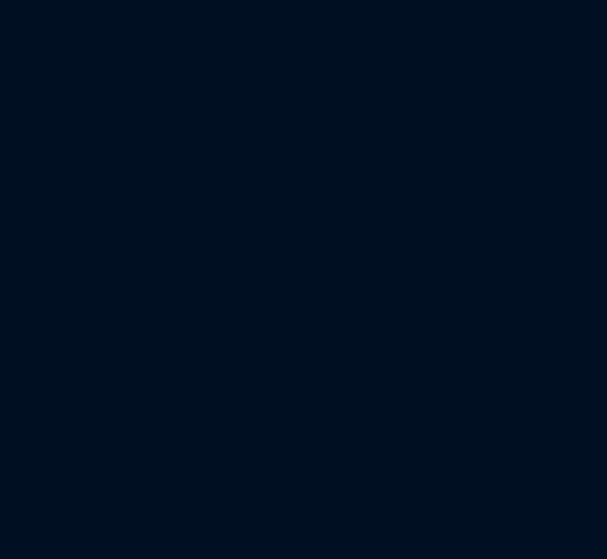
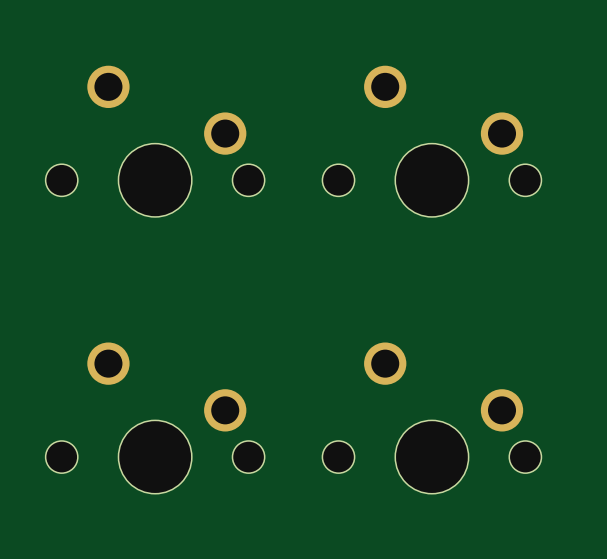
part: none -> (155, 141)
part: none -> (431, 141)
part: none -> (155, 418)
part: none -> (431, 418)

